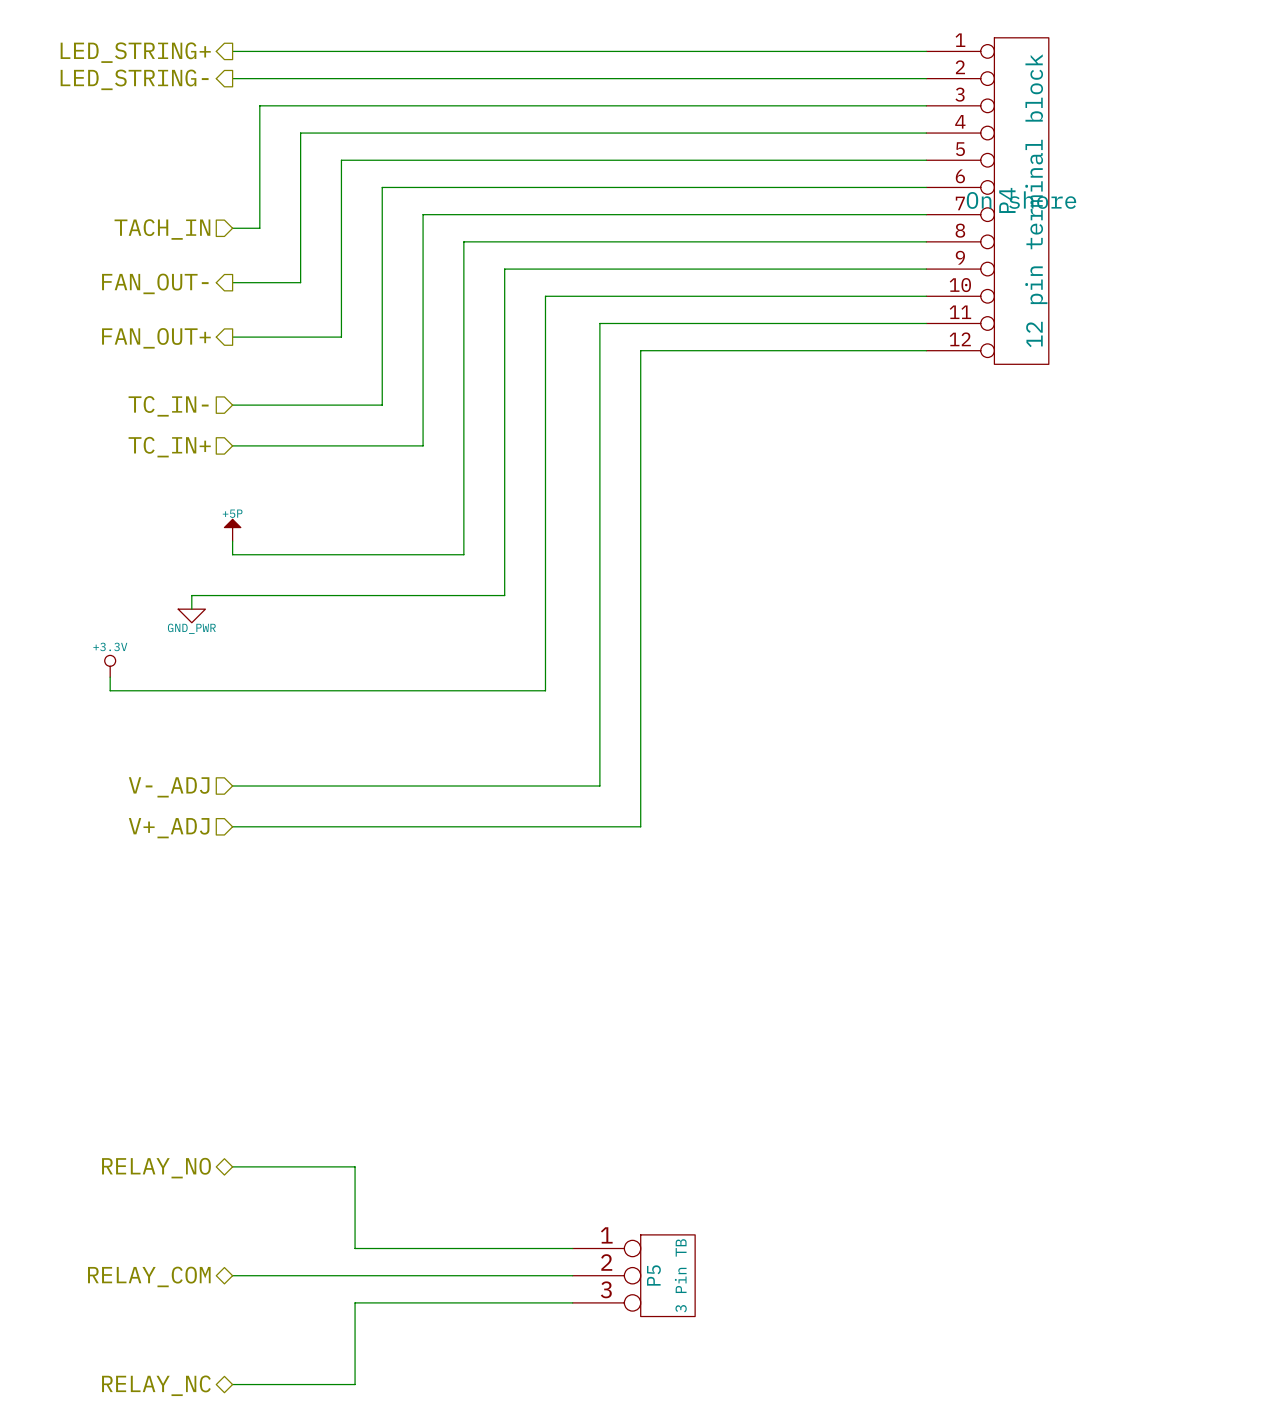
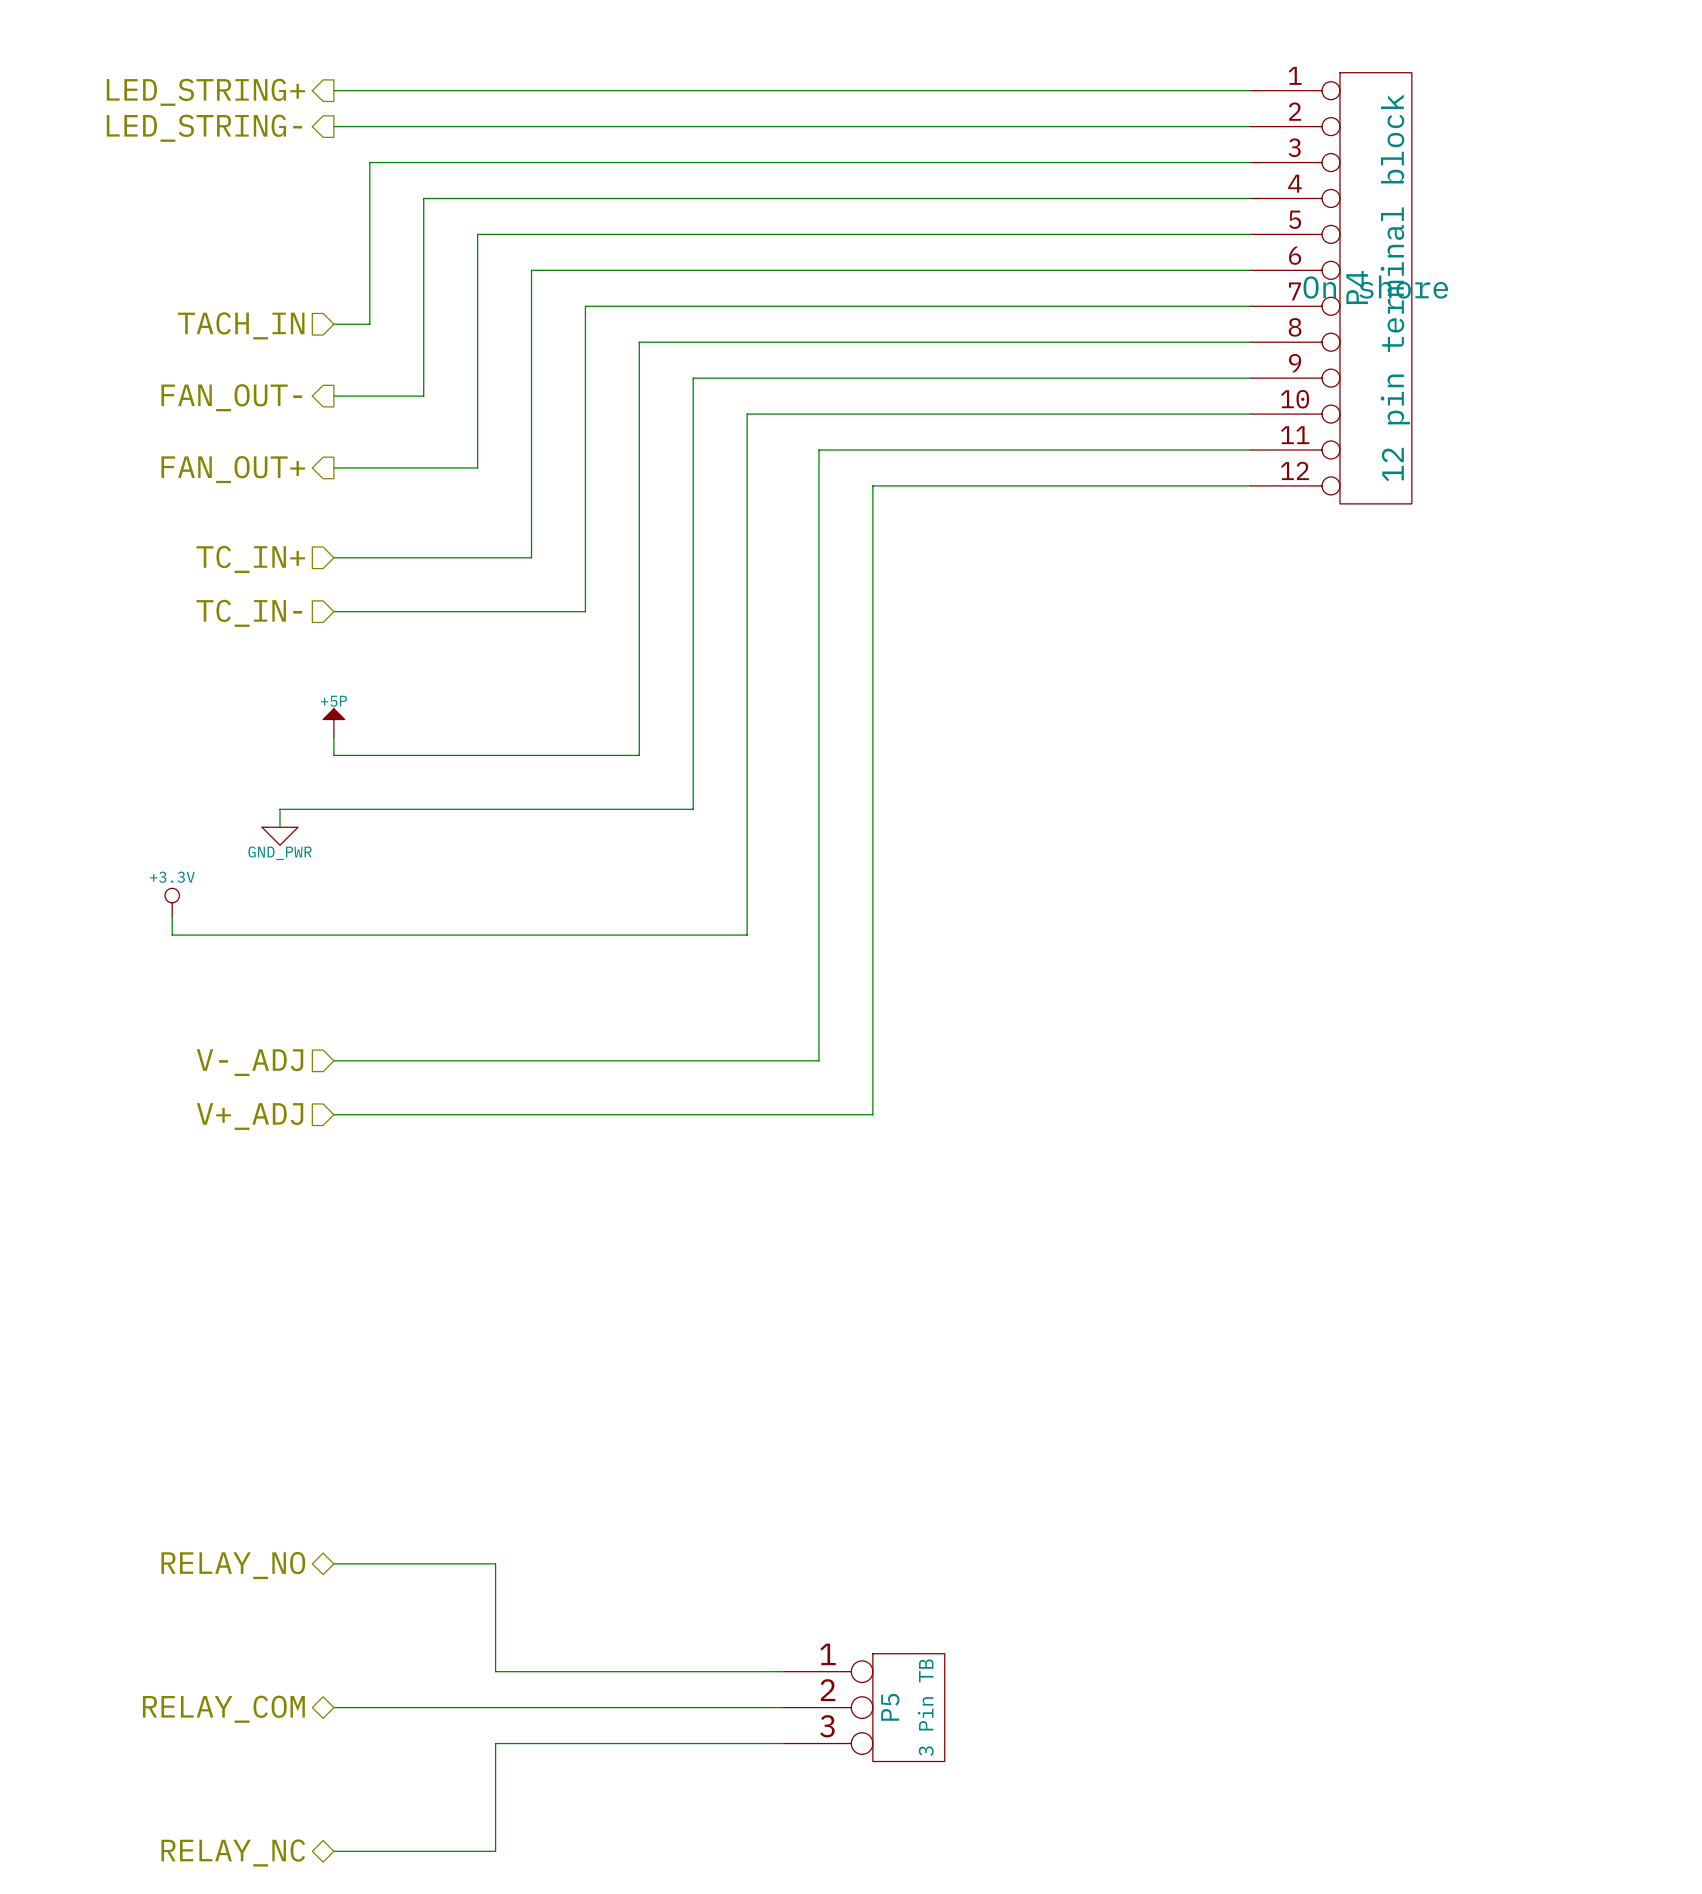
hierarchical label: TC_IN- (168, 406) -> TC_IN+ (250, 559)
hierarchical label: TC_IN+ (169, 447) -> TC_IN- (249, 613)

